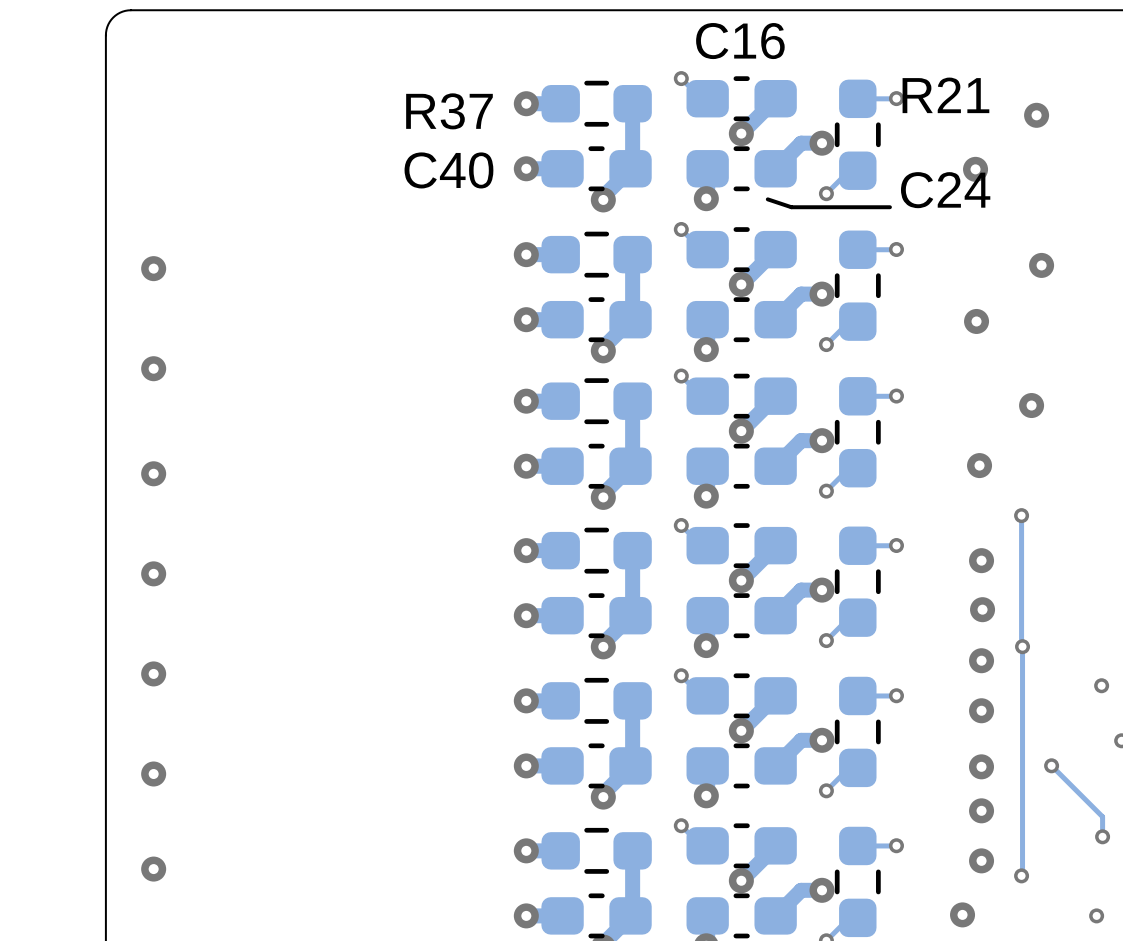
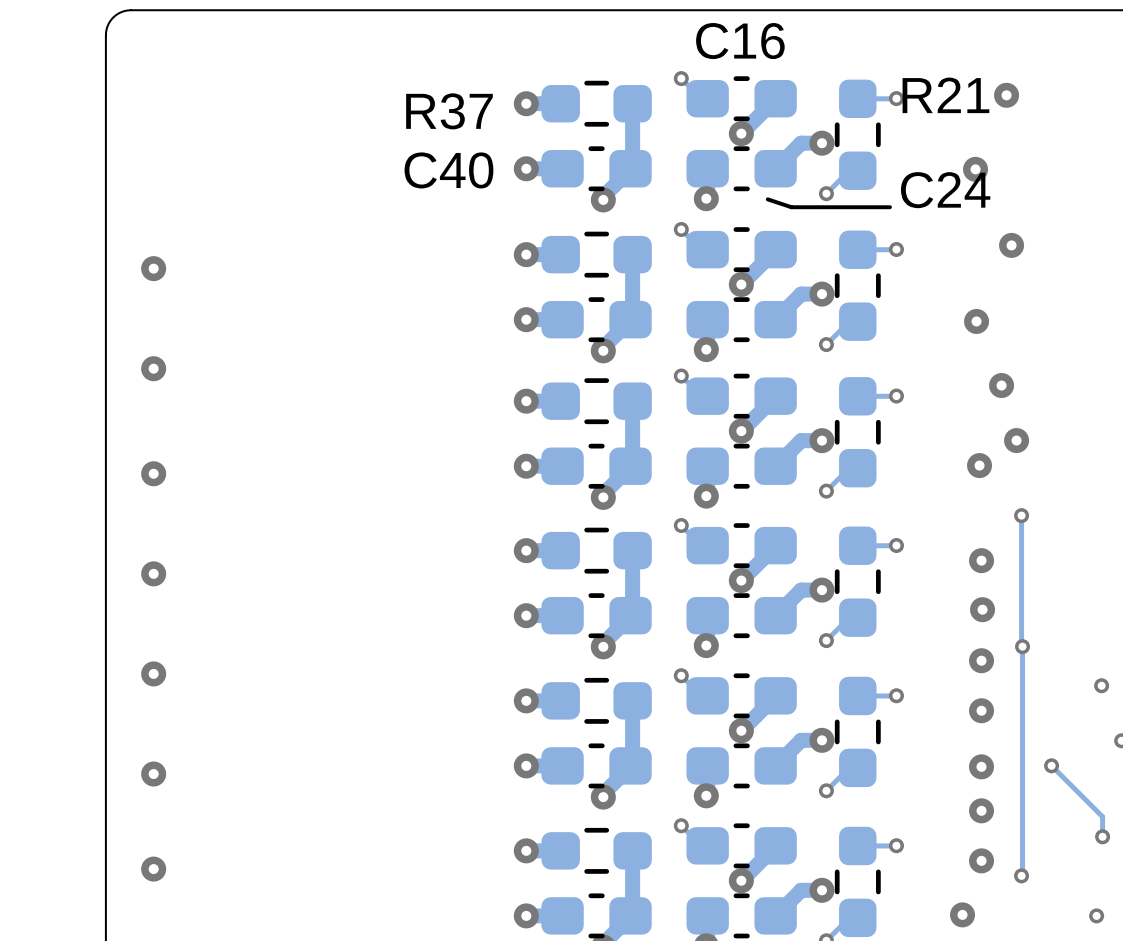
via position: (1036, 115) -> (1006, 95)
via position: (1041, 265) -> (1011, 245)
via: none -> (1001, 385)
via: (1031, 405) -> none
via: none -> (1016, 440)

